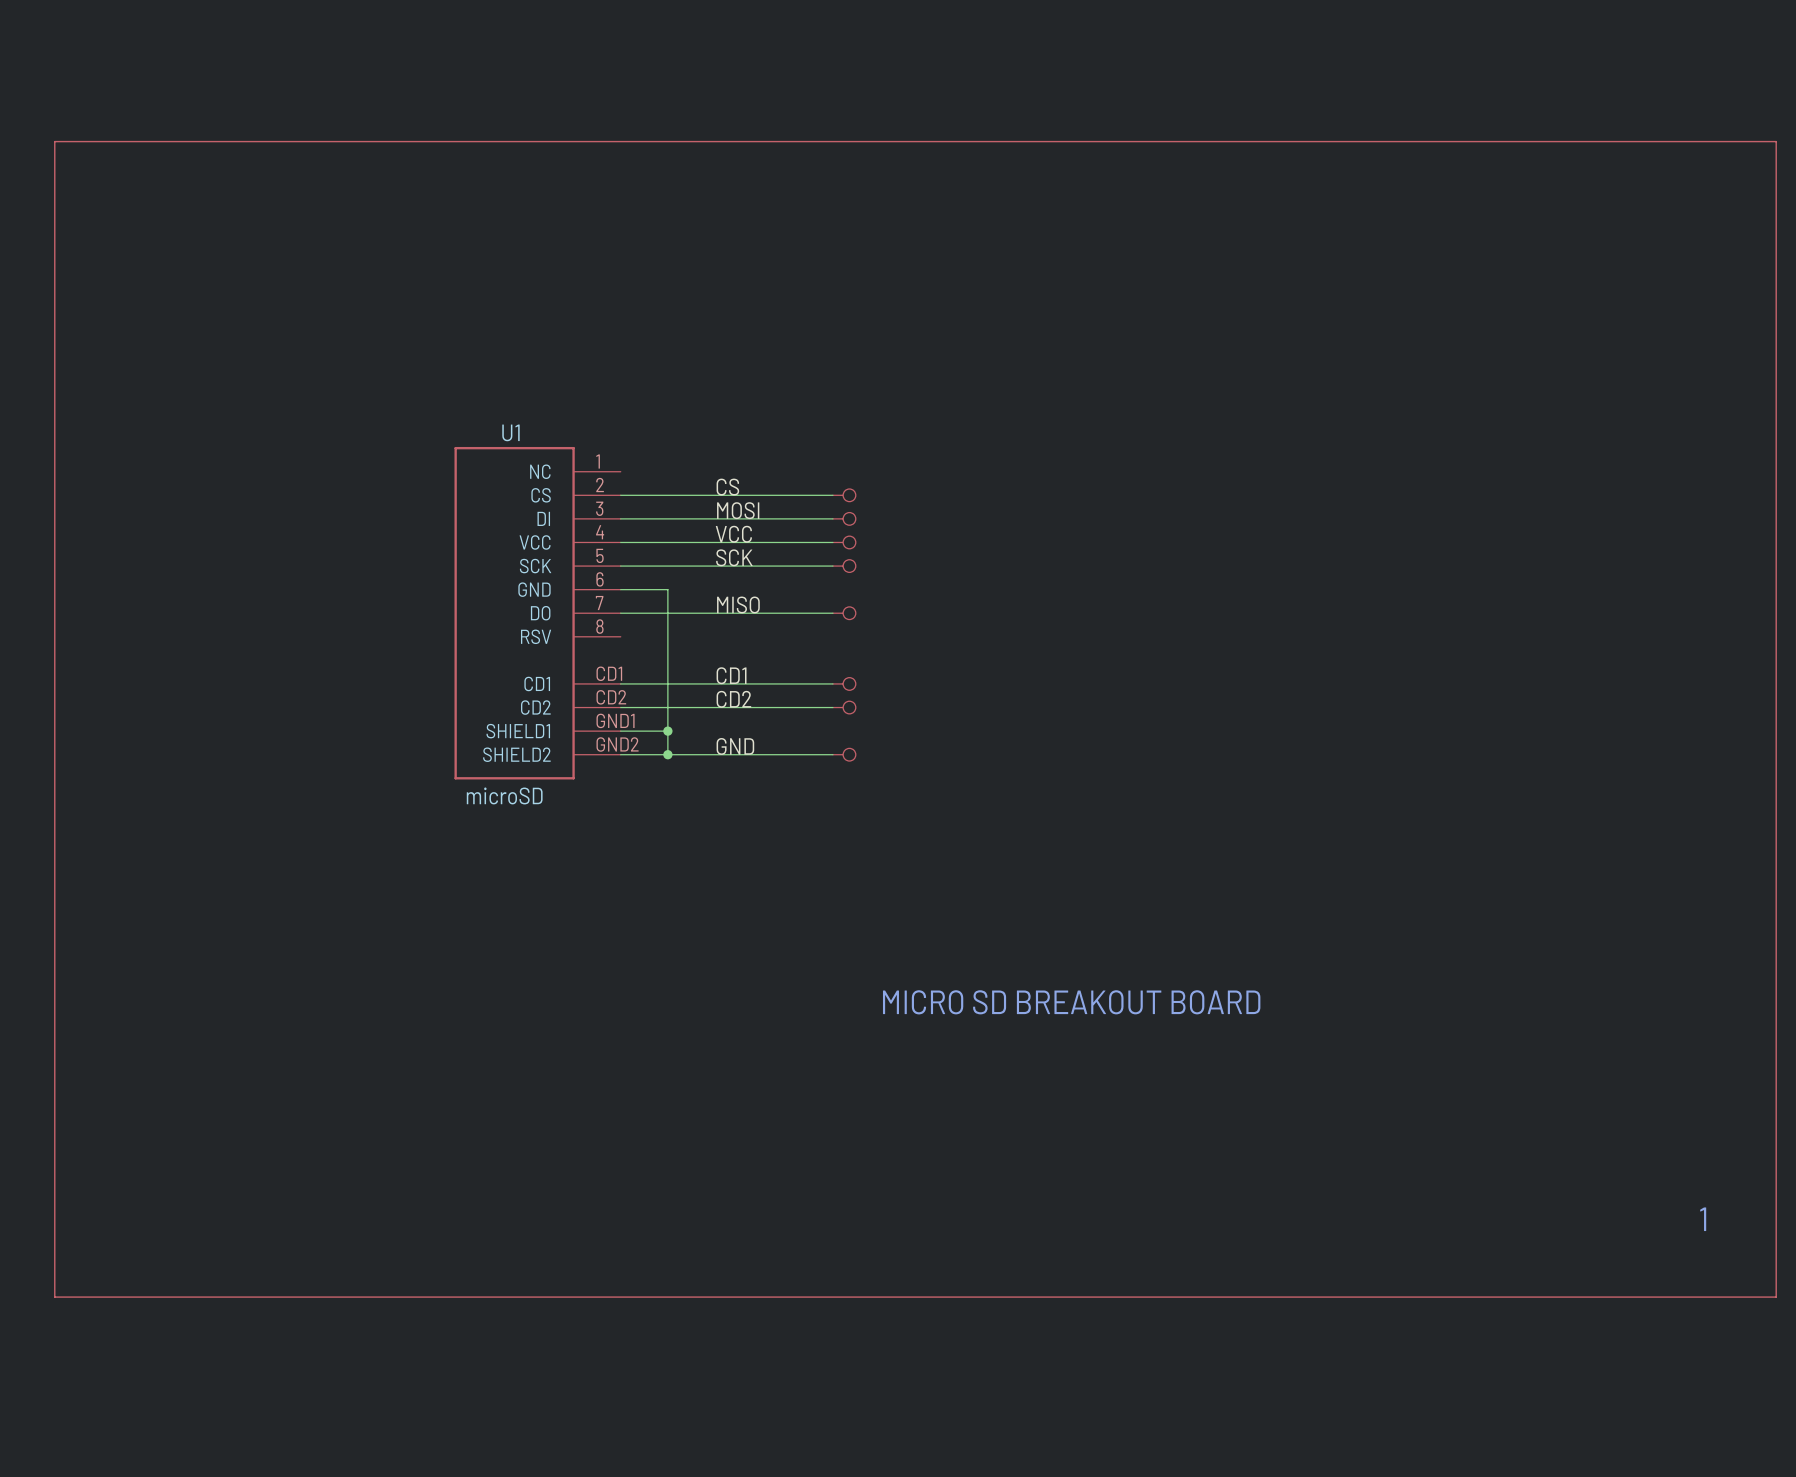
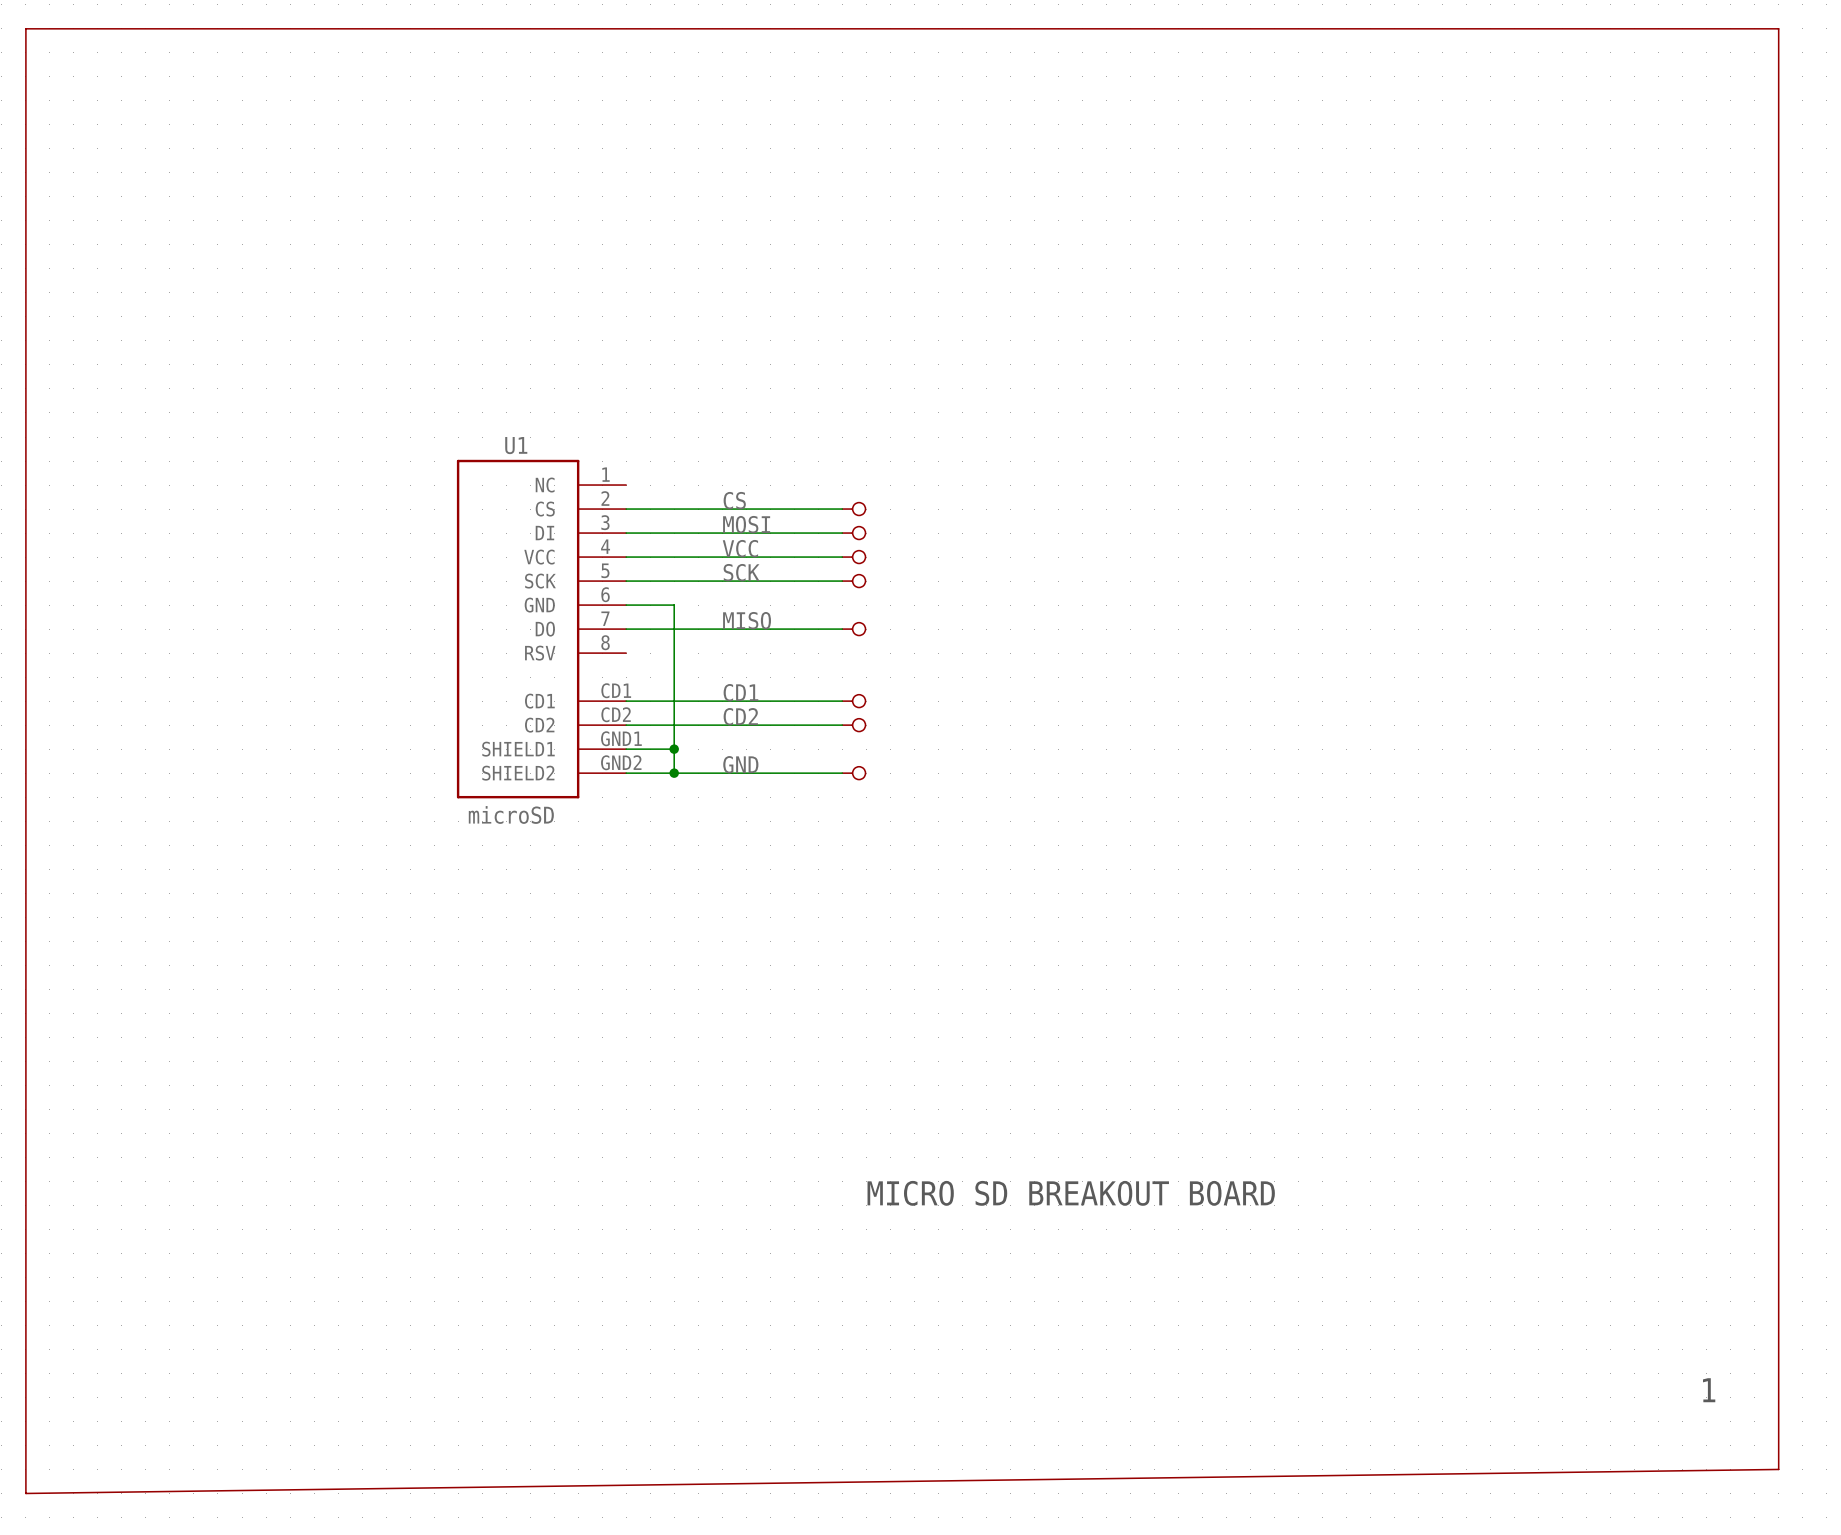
line: (54, 141) (1776, 141) (1776, 1297) (54, 1297) (54, 141) -> (25, 28) (25, 1493) (1778, 1469) (1778, 28) (25, 28)
text position: MICRO SD BREAKOUT BOARD (1071, 1002) -> MICRO SD BREAKOUT BOARD (1071, 1193)
text position: 1 (1703, 1219) -> 1 (1709, 1390)

